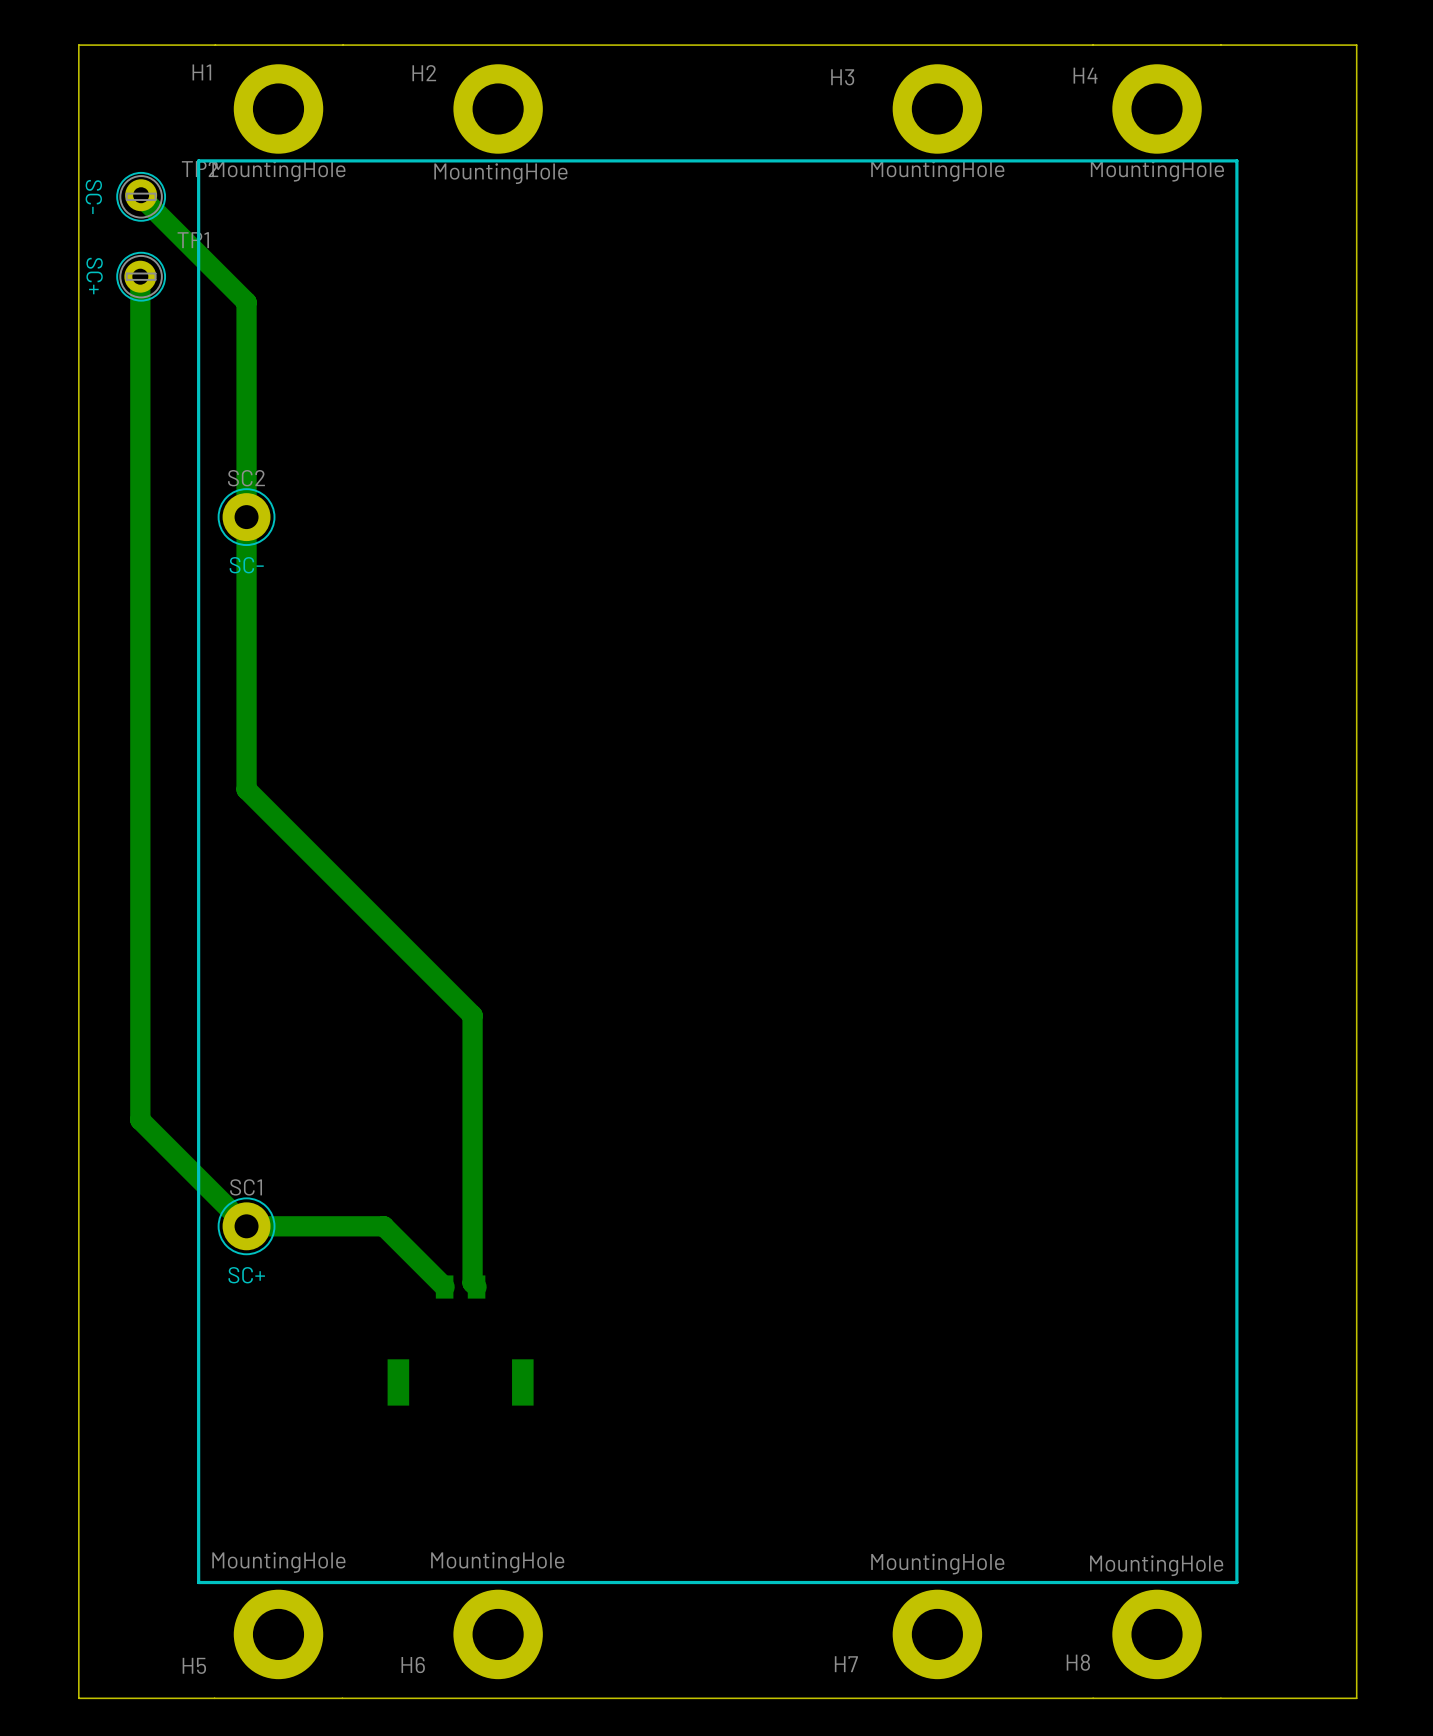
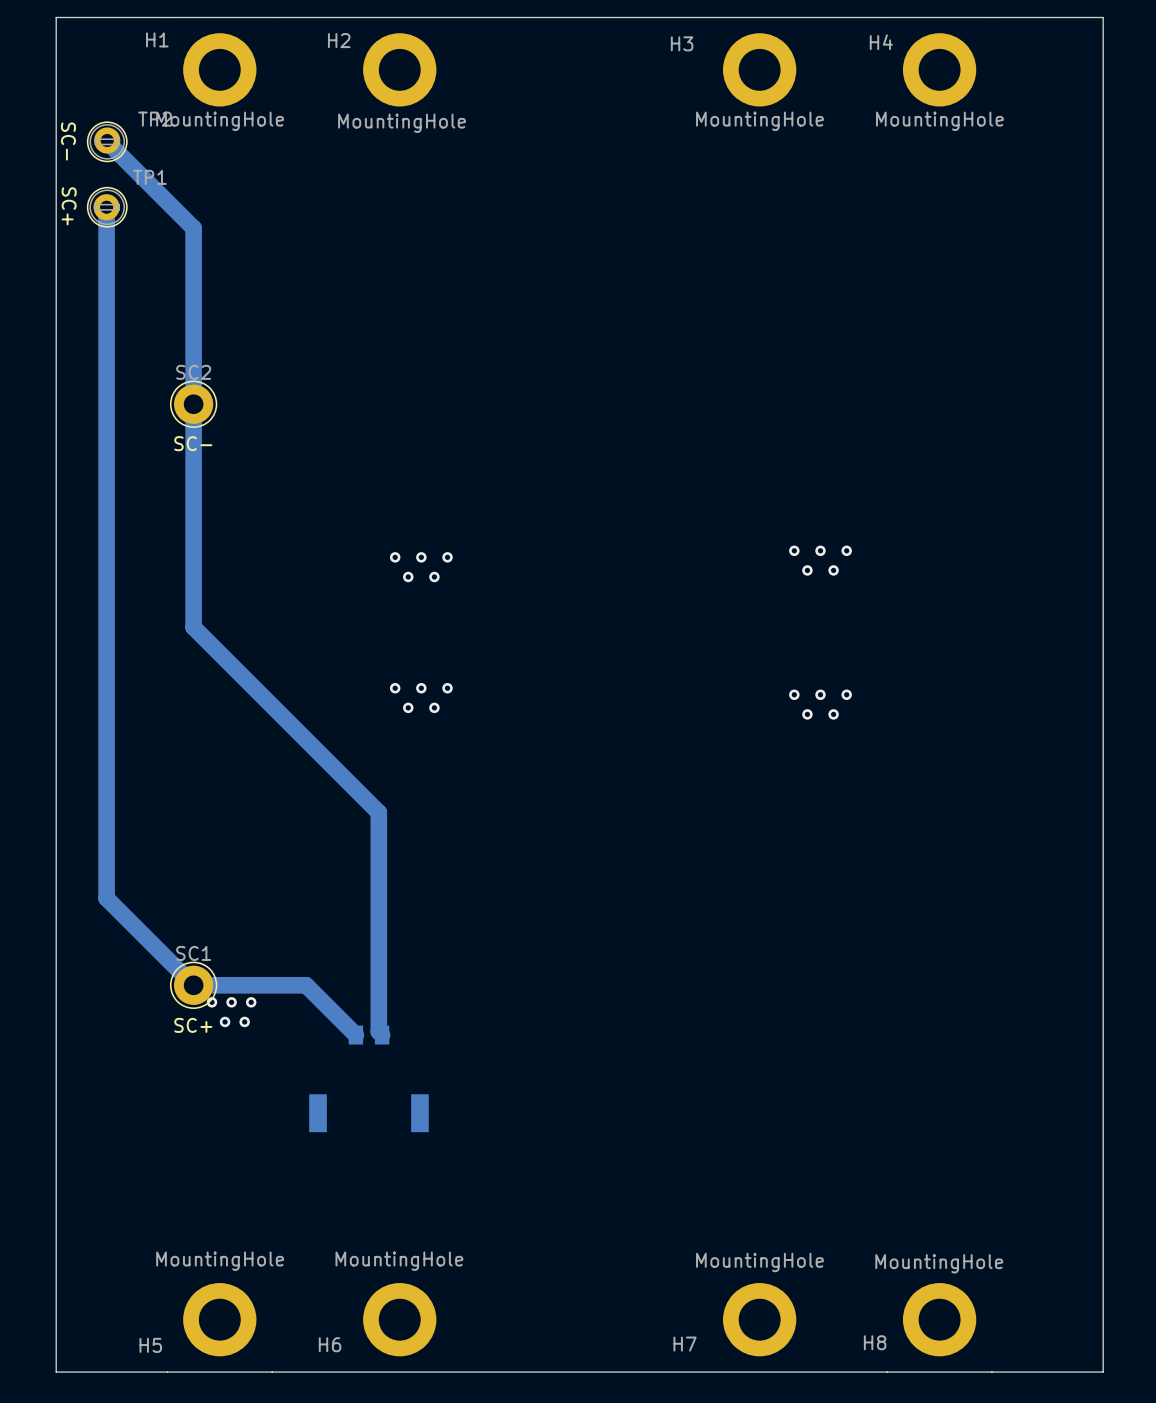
line: (198, 160) (1236, 160) (1236, 1582) (198, 1582) (198, 160) -> none
via: none -> (794, 550)
via: none -> (820, 550)
via: none -> (846, 550)
via: none -> (395, 557)
via: none -> (421, 557)
via: none -> (447, 557)
via: none -> (807, 570)
via: none -> (833, 570)
via: none -> (408, 576)
via: none -> (434, 576)
via: none -> (395, 688)
via: none -> (421, 688)
via: none -> (447, 688)
via: none -> (794, 694)
via: none -> (820, 694)
via: none -> (846, 694)
via: none -> (408, 707)
via: none -> (434, 707)
via: none -> (807, 714)
via: none -> (833, 714)
via: none -> (211, 1002)
via: none -> (231, 1002)
via: none -> (251, 1002)
via: none -> (225, 1021)
via: none -> (244, 1021)

